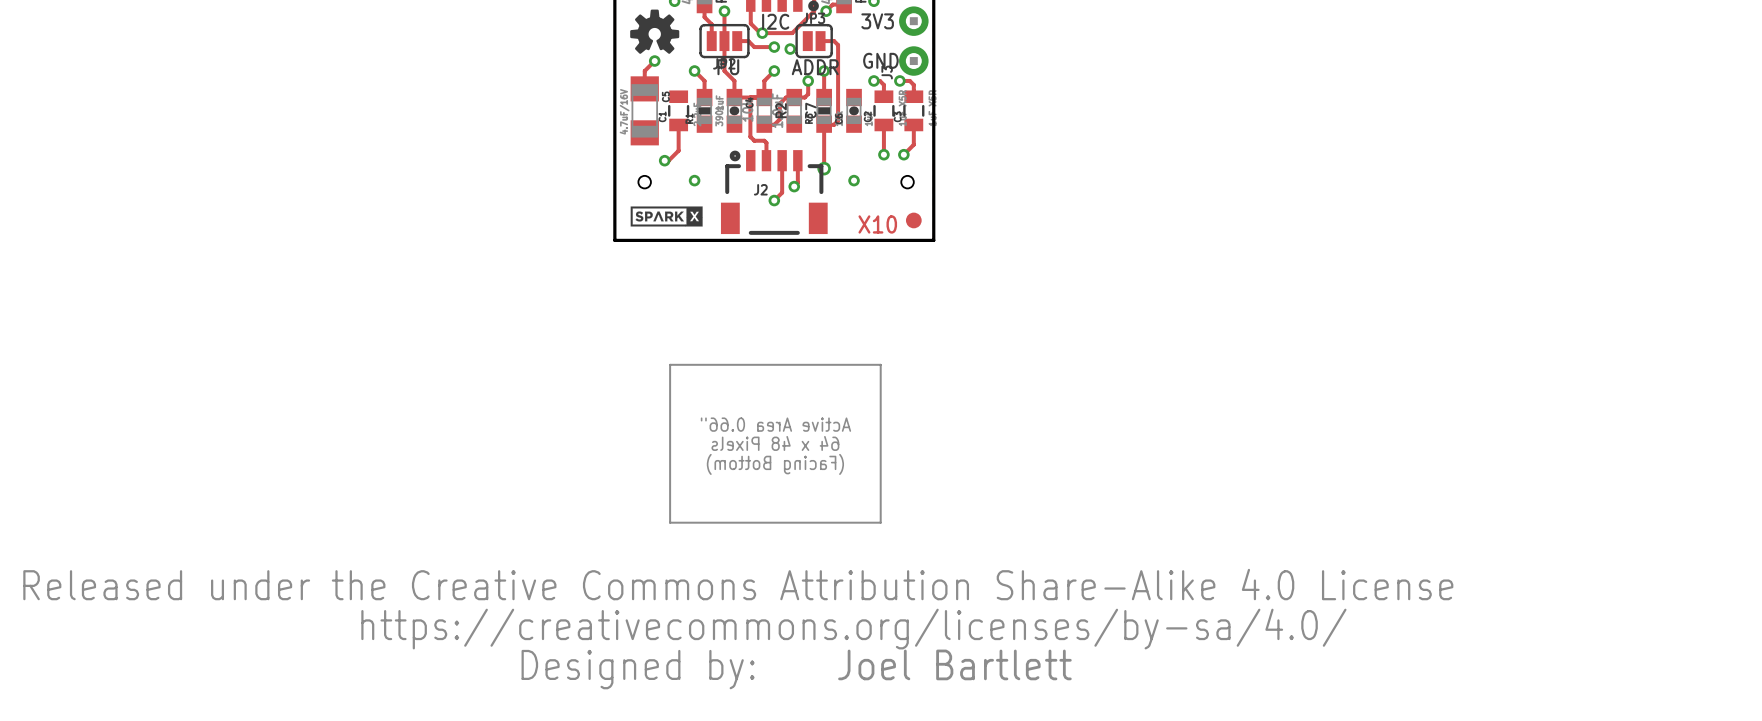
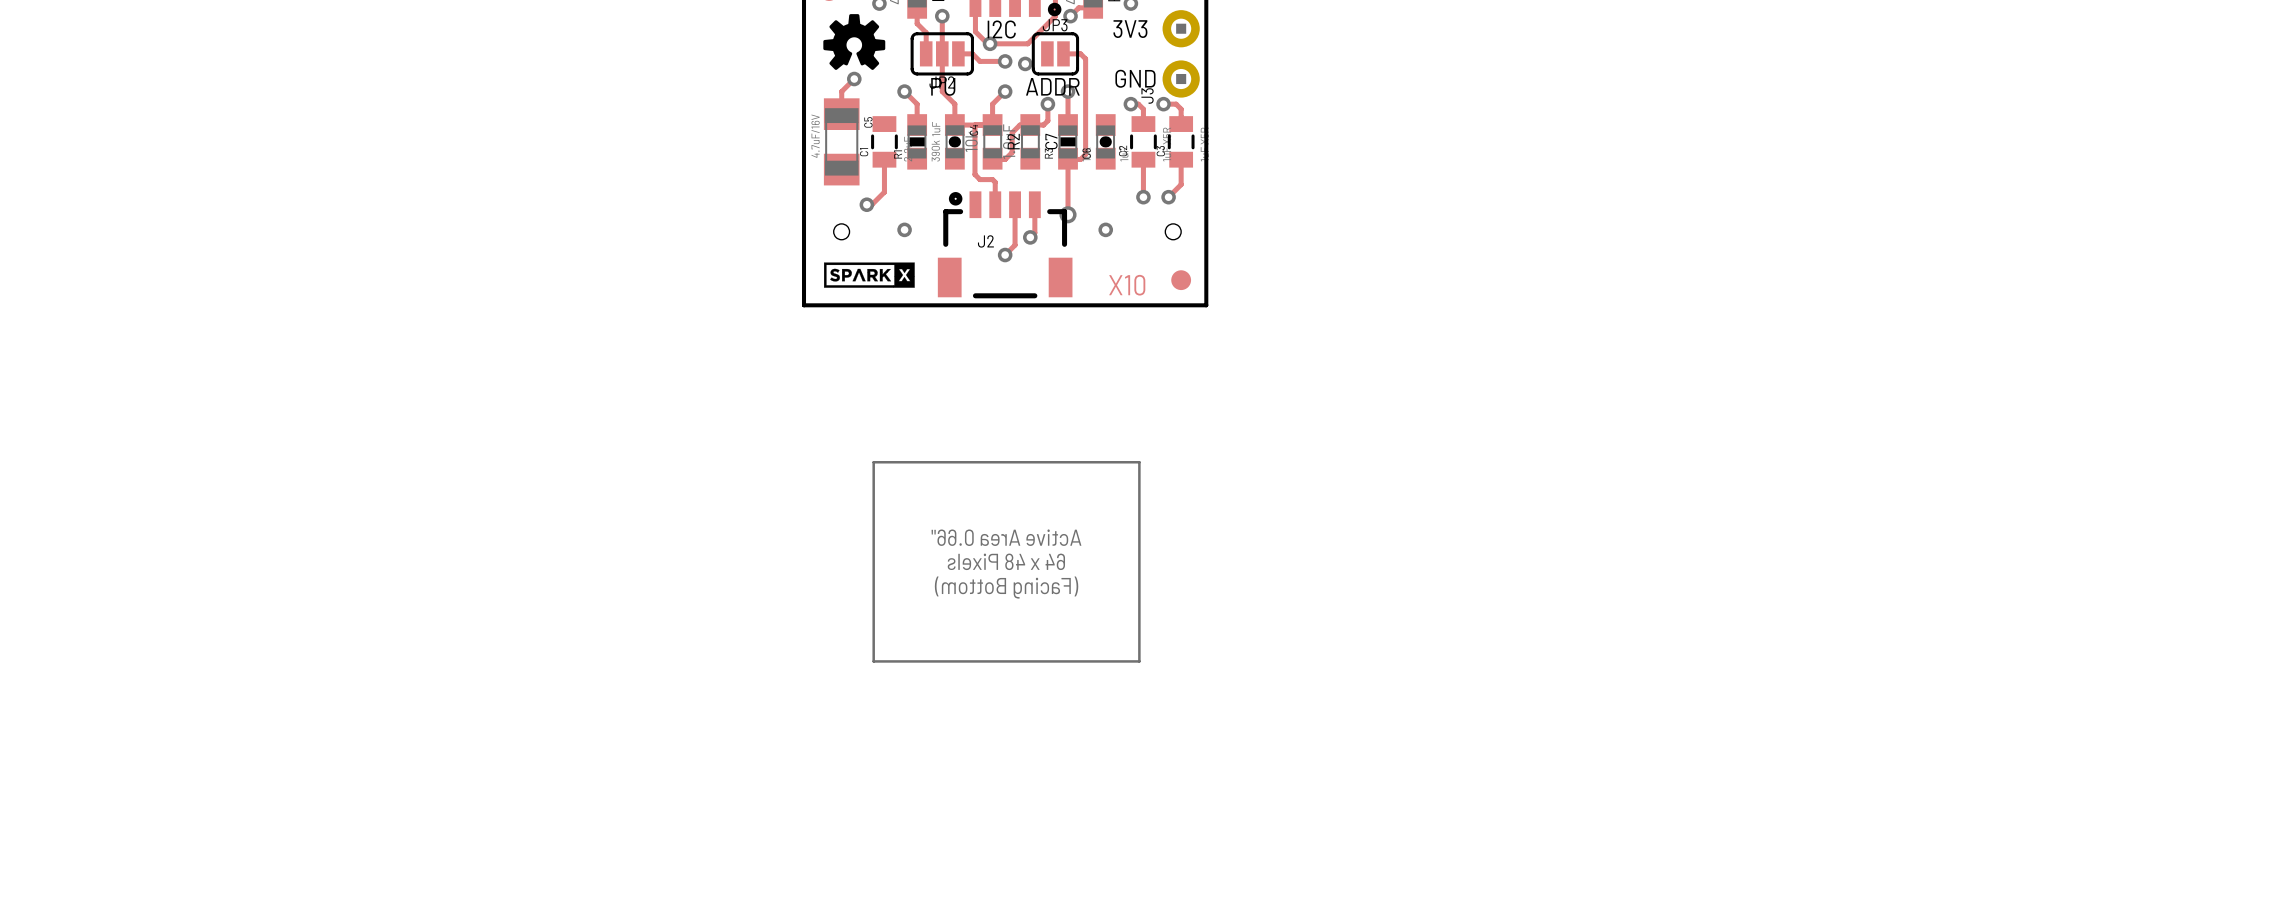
drawing: [23, 568, 1454, 690] -> none
text: Joel Bartlett (954, 664) -> none

